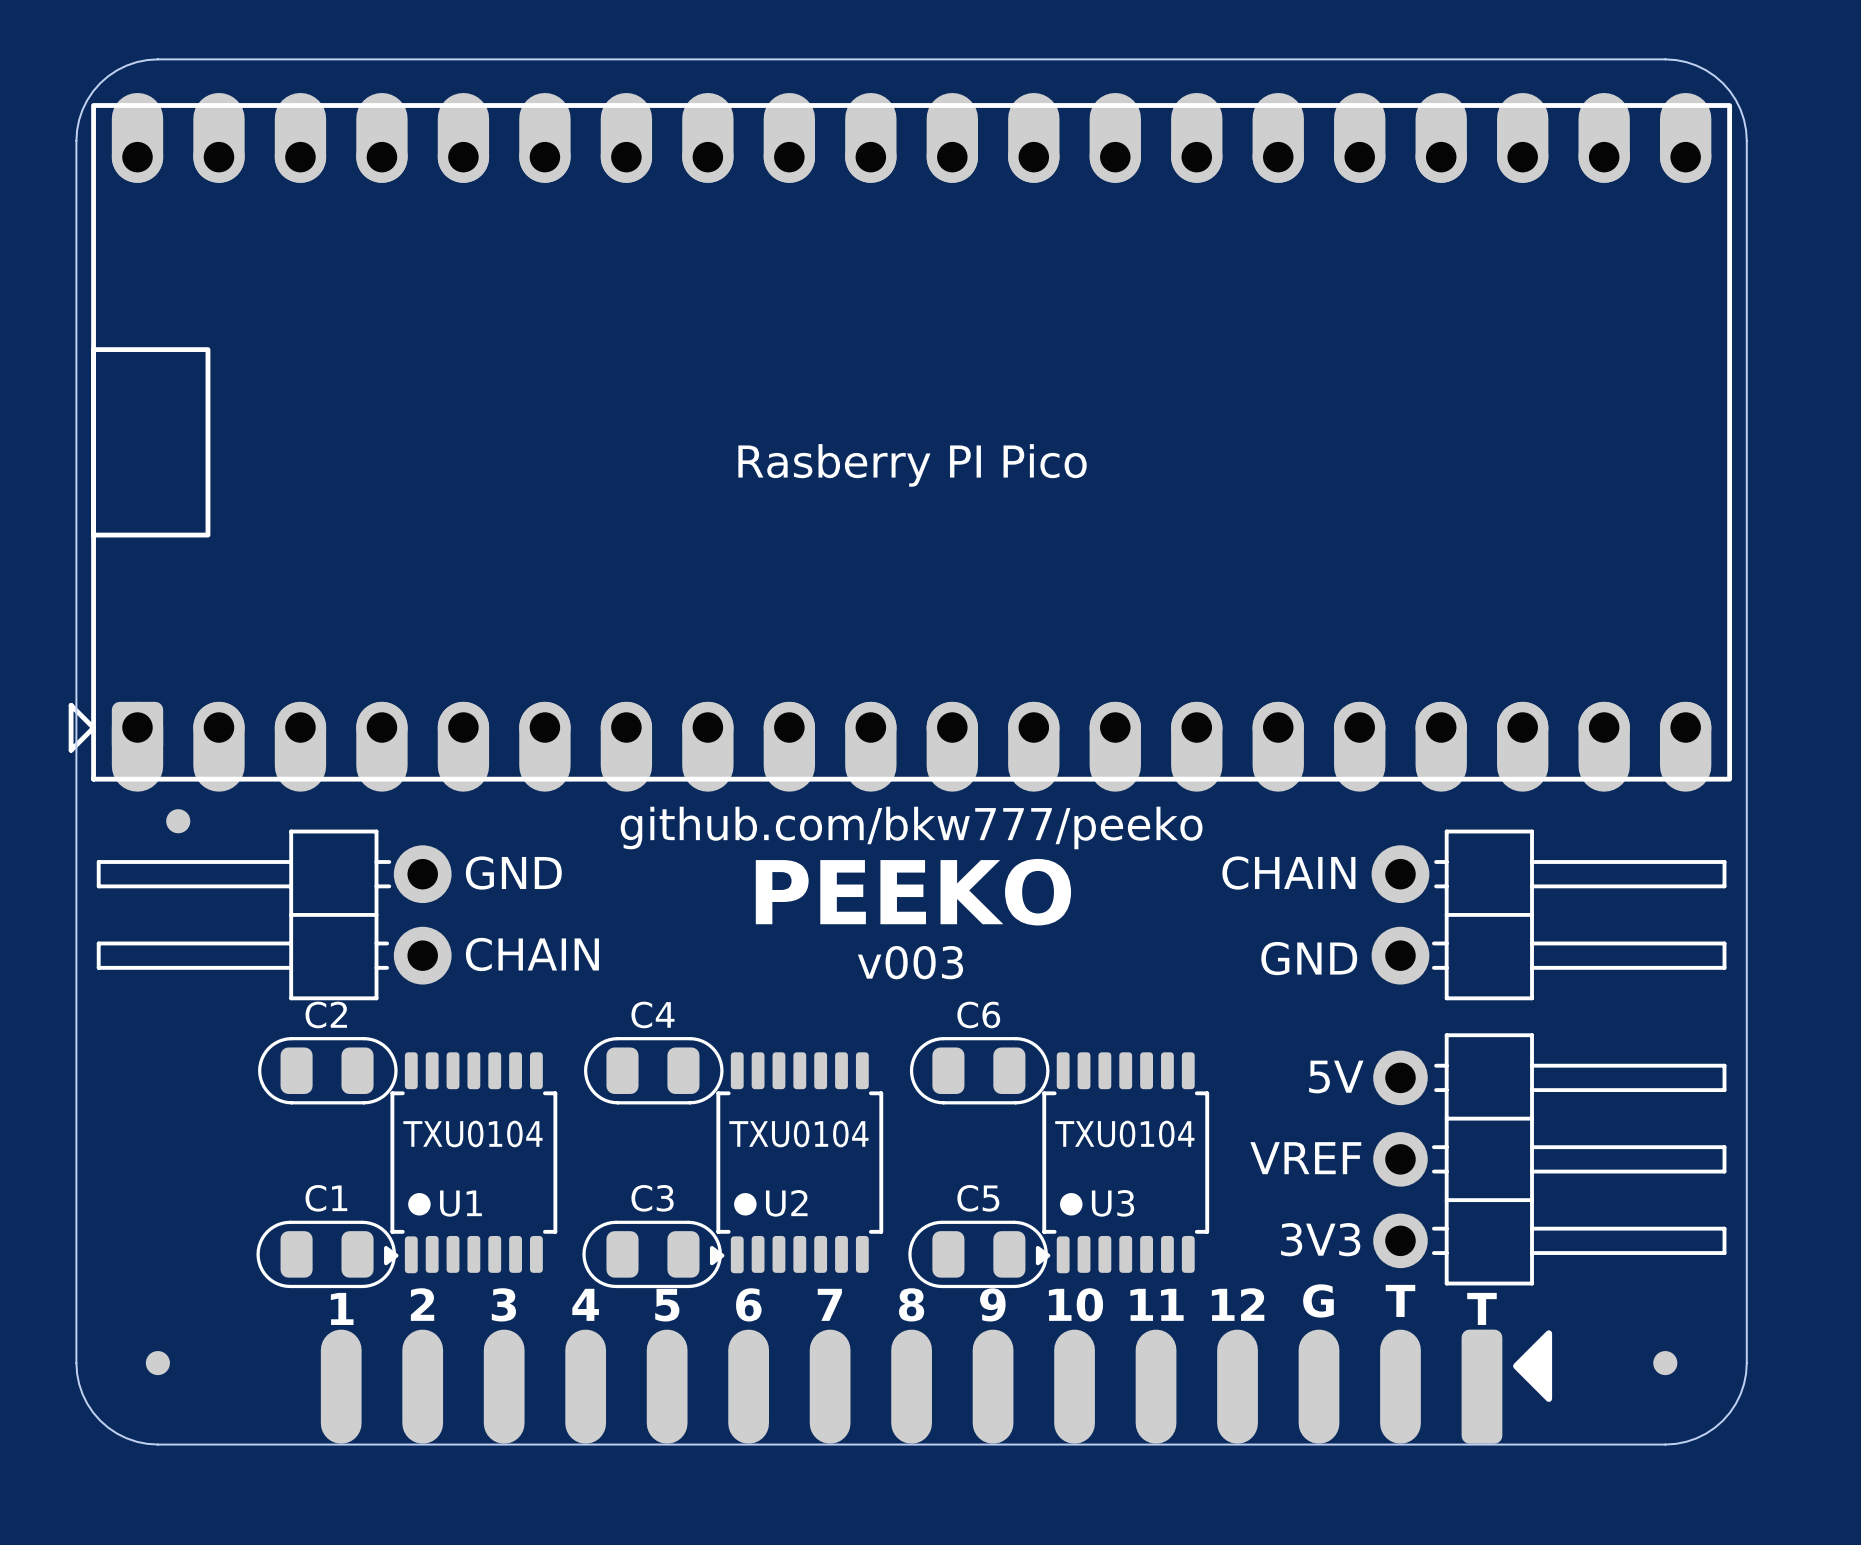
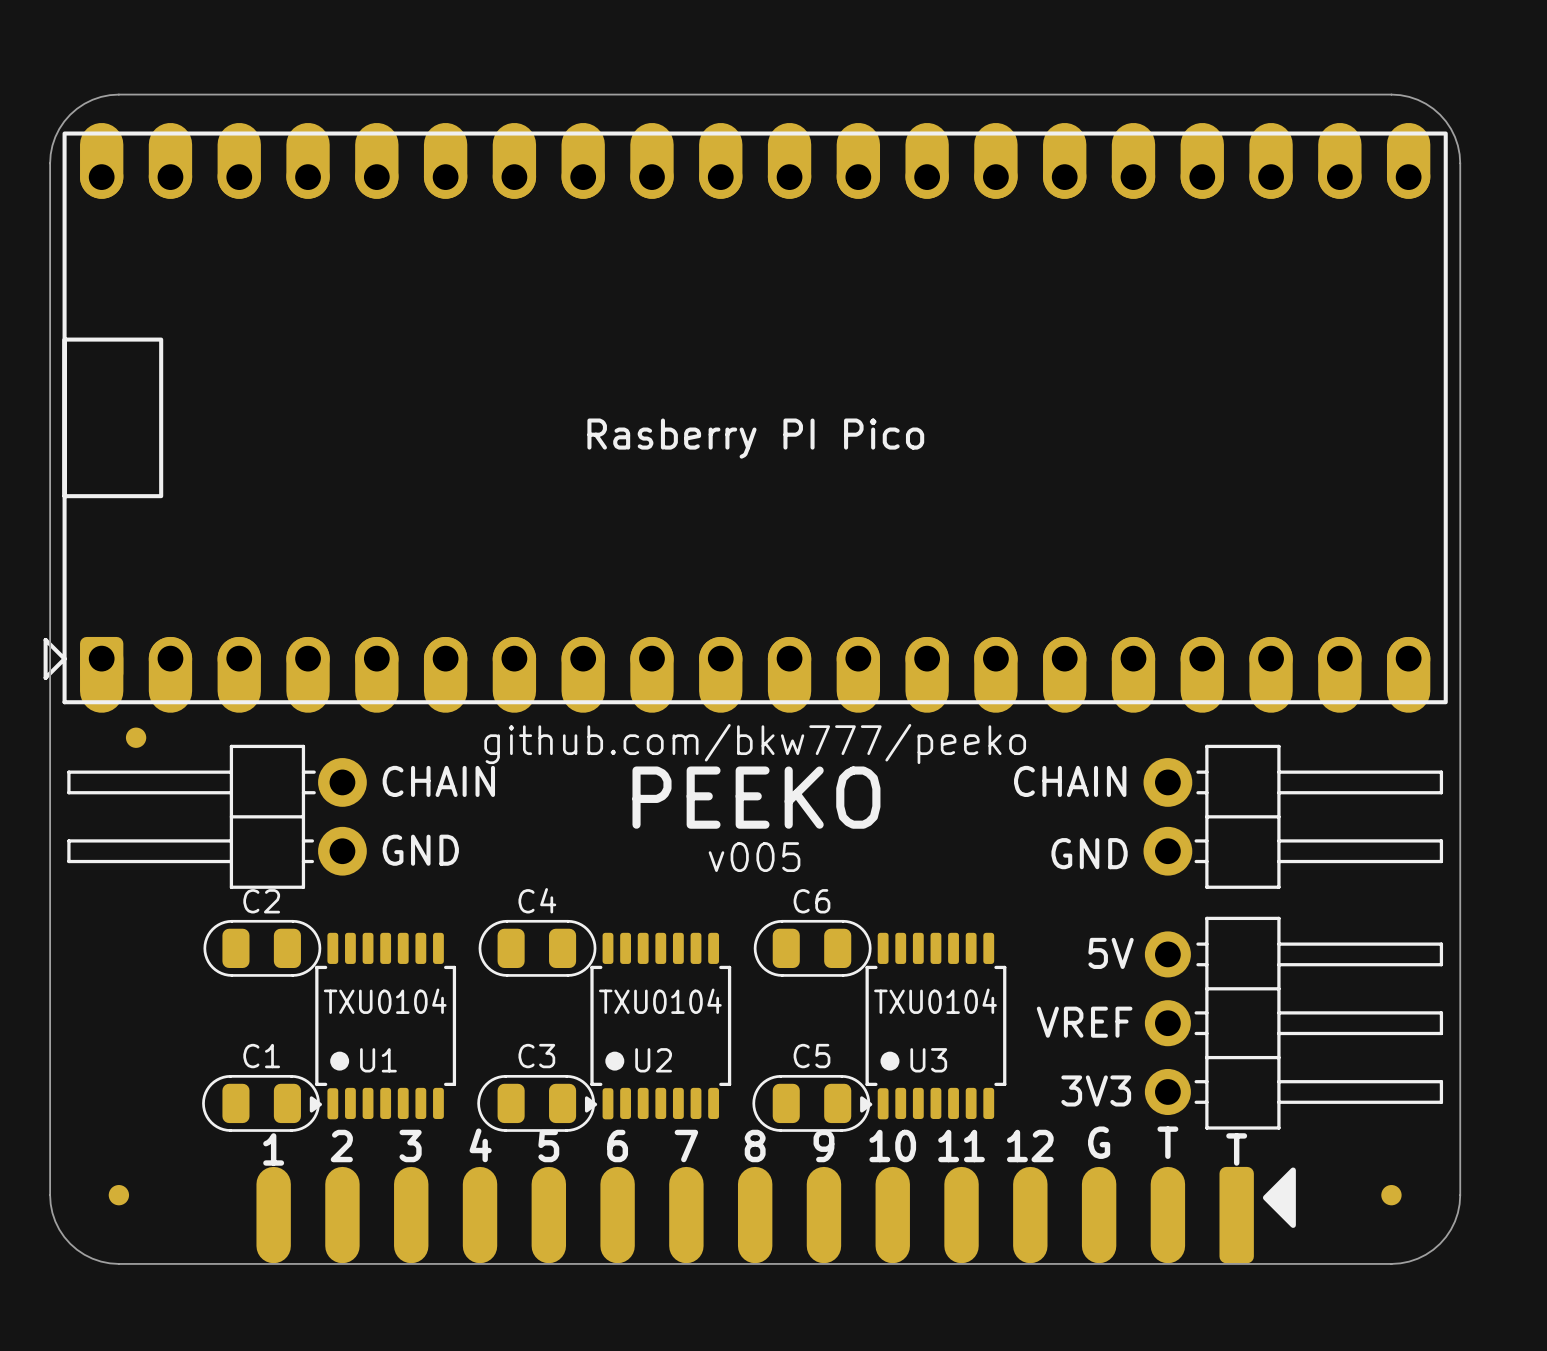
text: GND (513, 873) -> CHAIN (438, 781)
text: CHAIN (532, 954) -> GND (420, 850)
text: v003 (910, 962) -> v005 (754, 857)

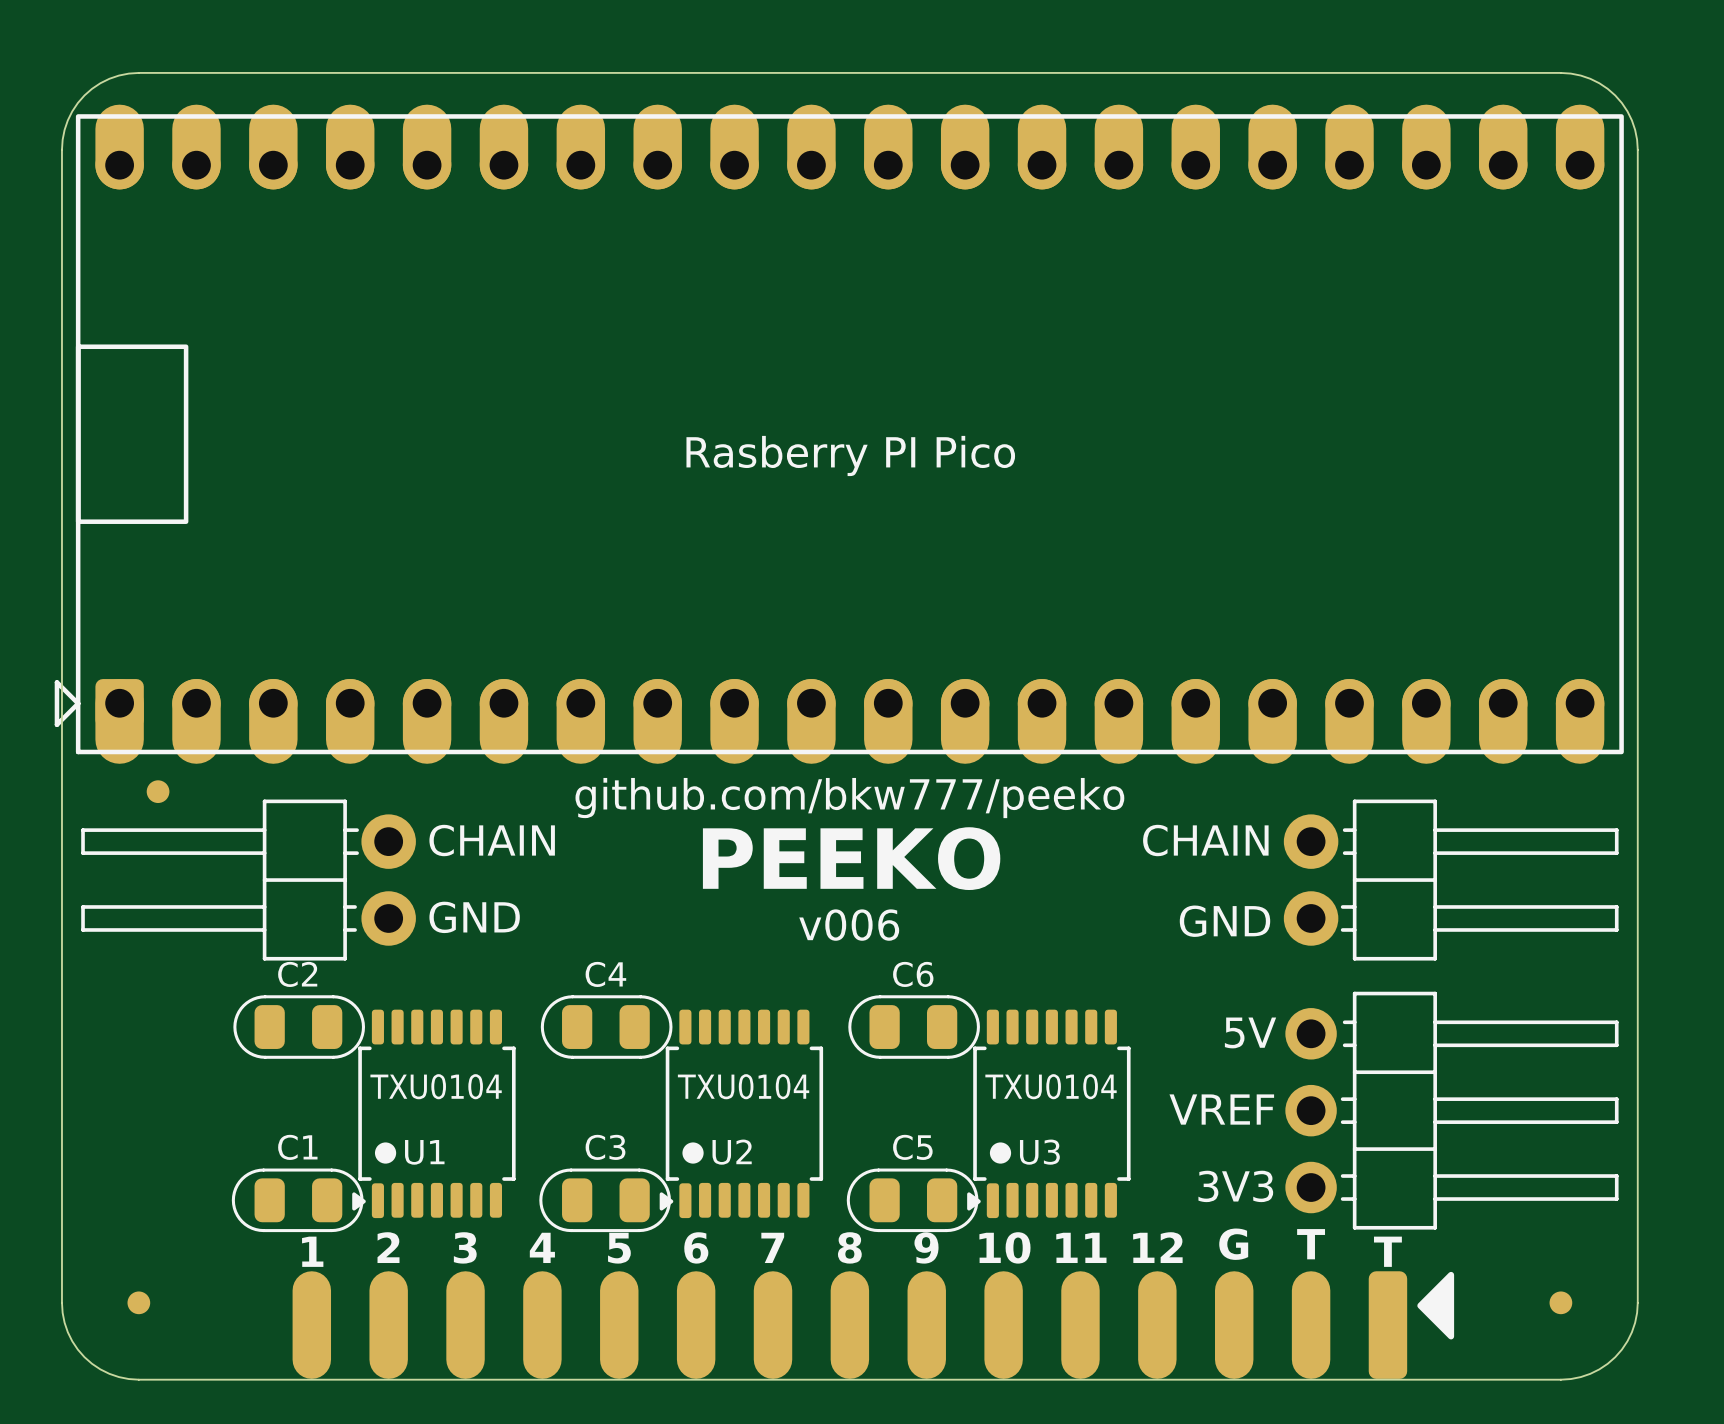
text: v005 (754, 857) -> v006 (849, 925)

